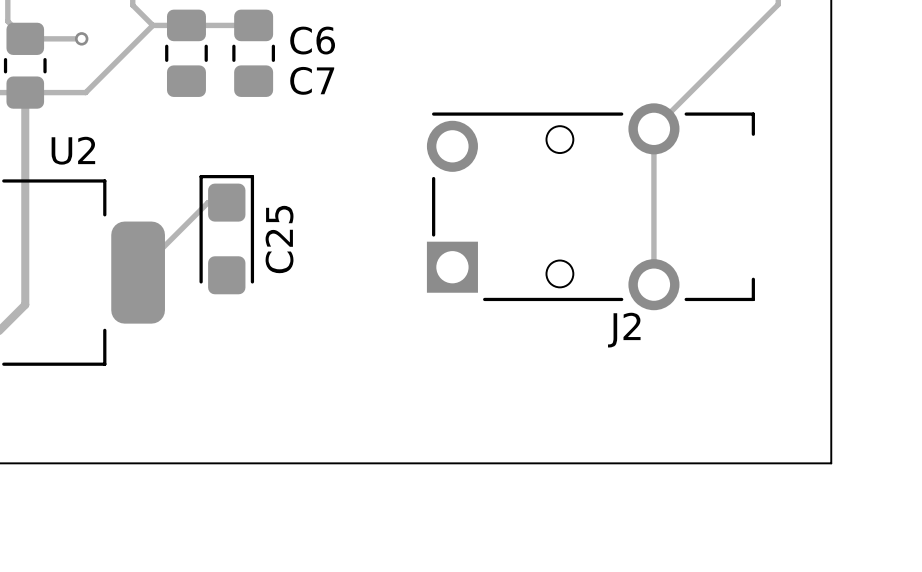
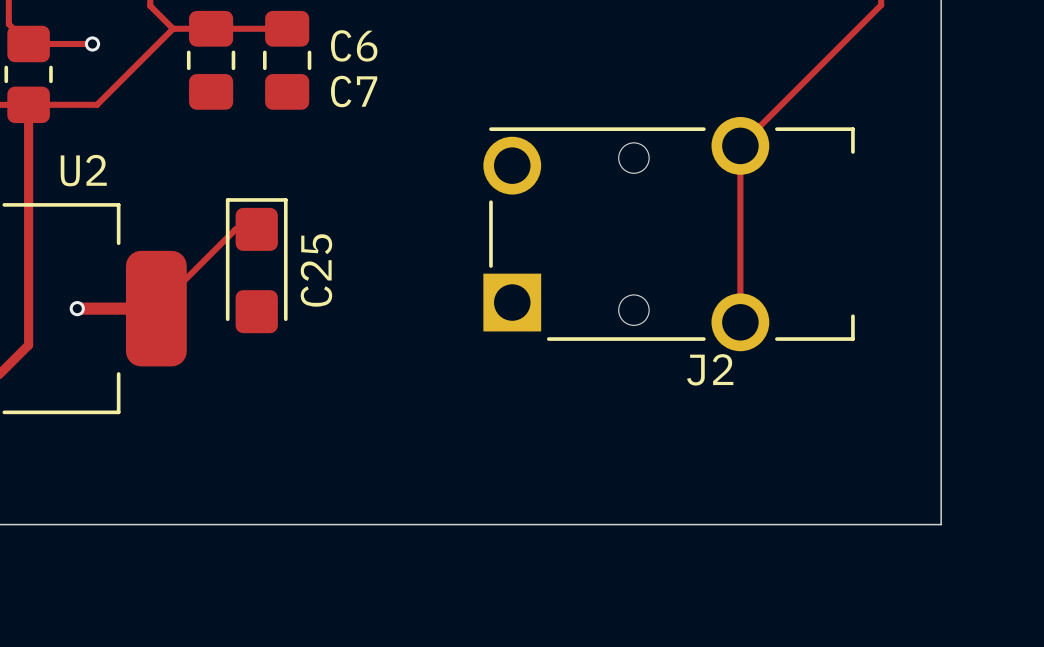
track: none -> (77, 308) (156, 308)
via: none -> (77, 308)

